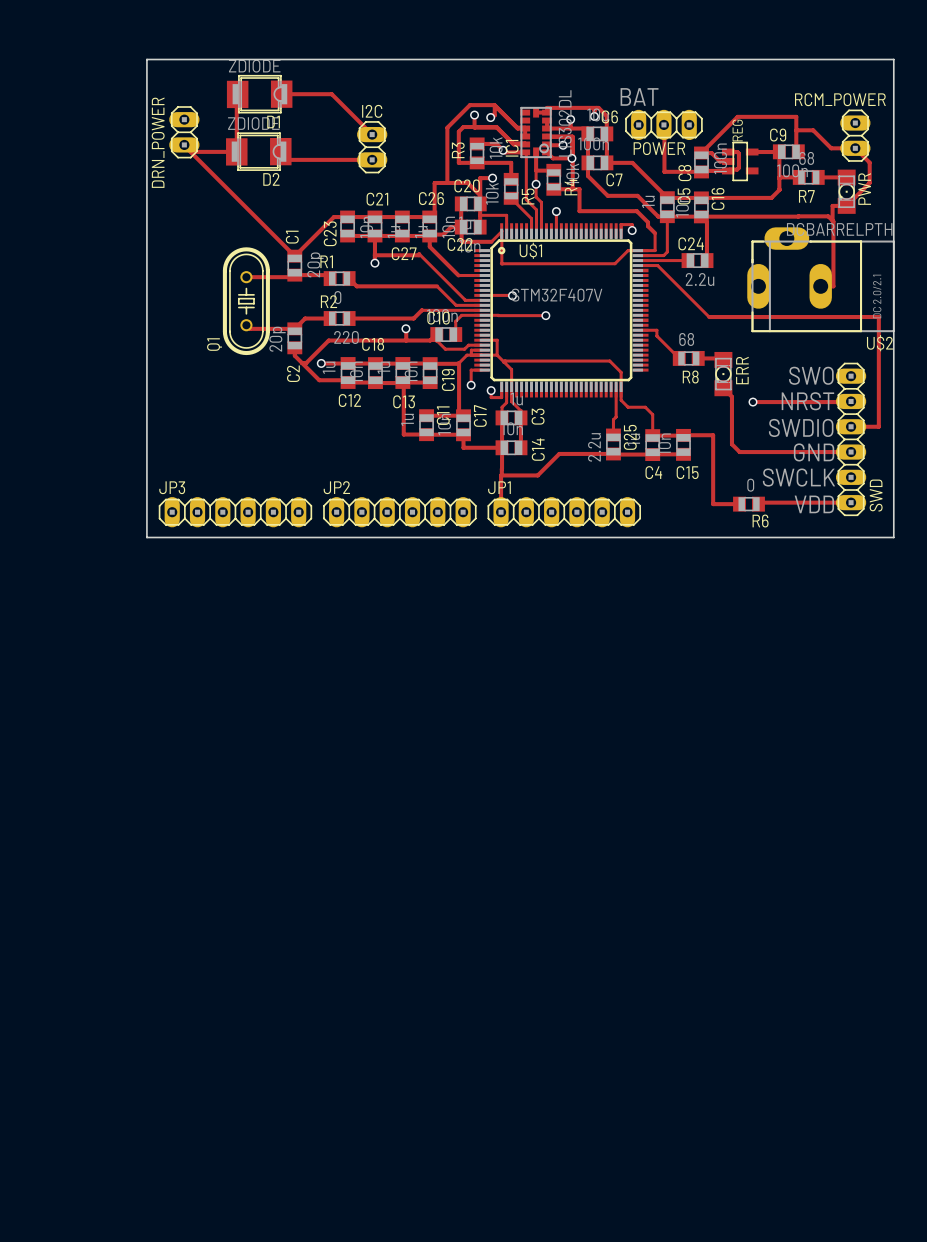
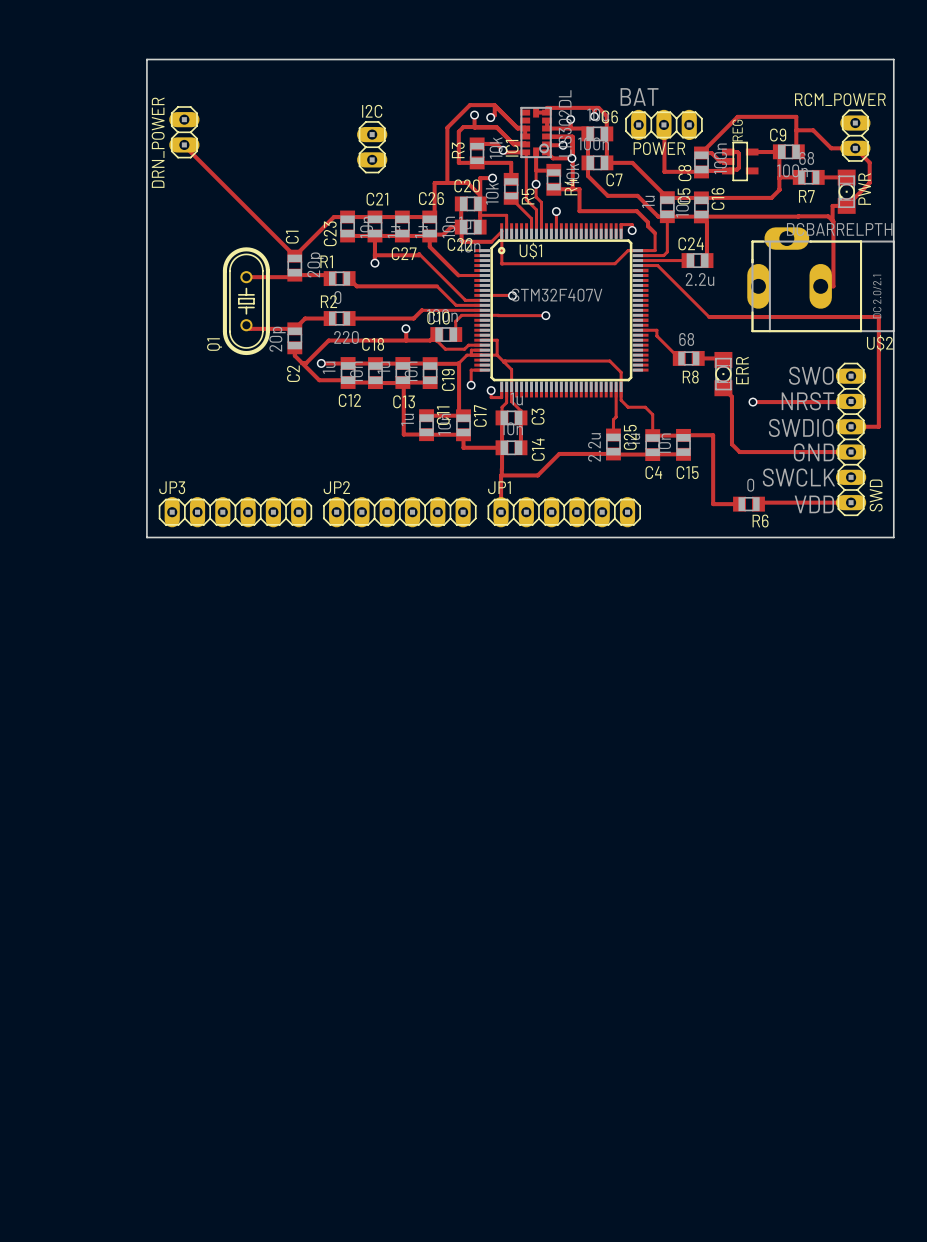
track: (237, 94) (236, 151) (191, 151) (184, 144) -> none
D1: ZDIODE (259, 94) -> none
track: (281, 94) (331, 94) (372, 134) -> none
D2: ZDIODE (258, 151) -> none
track: (280, 151) (289, 159) (372, 159) -> none

